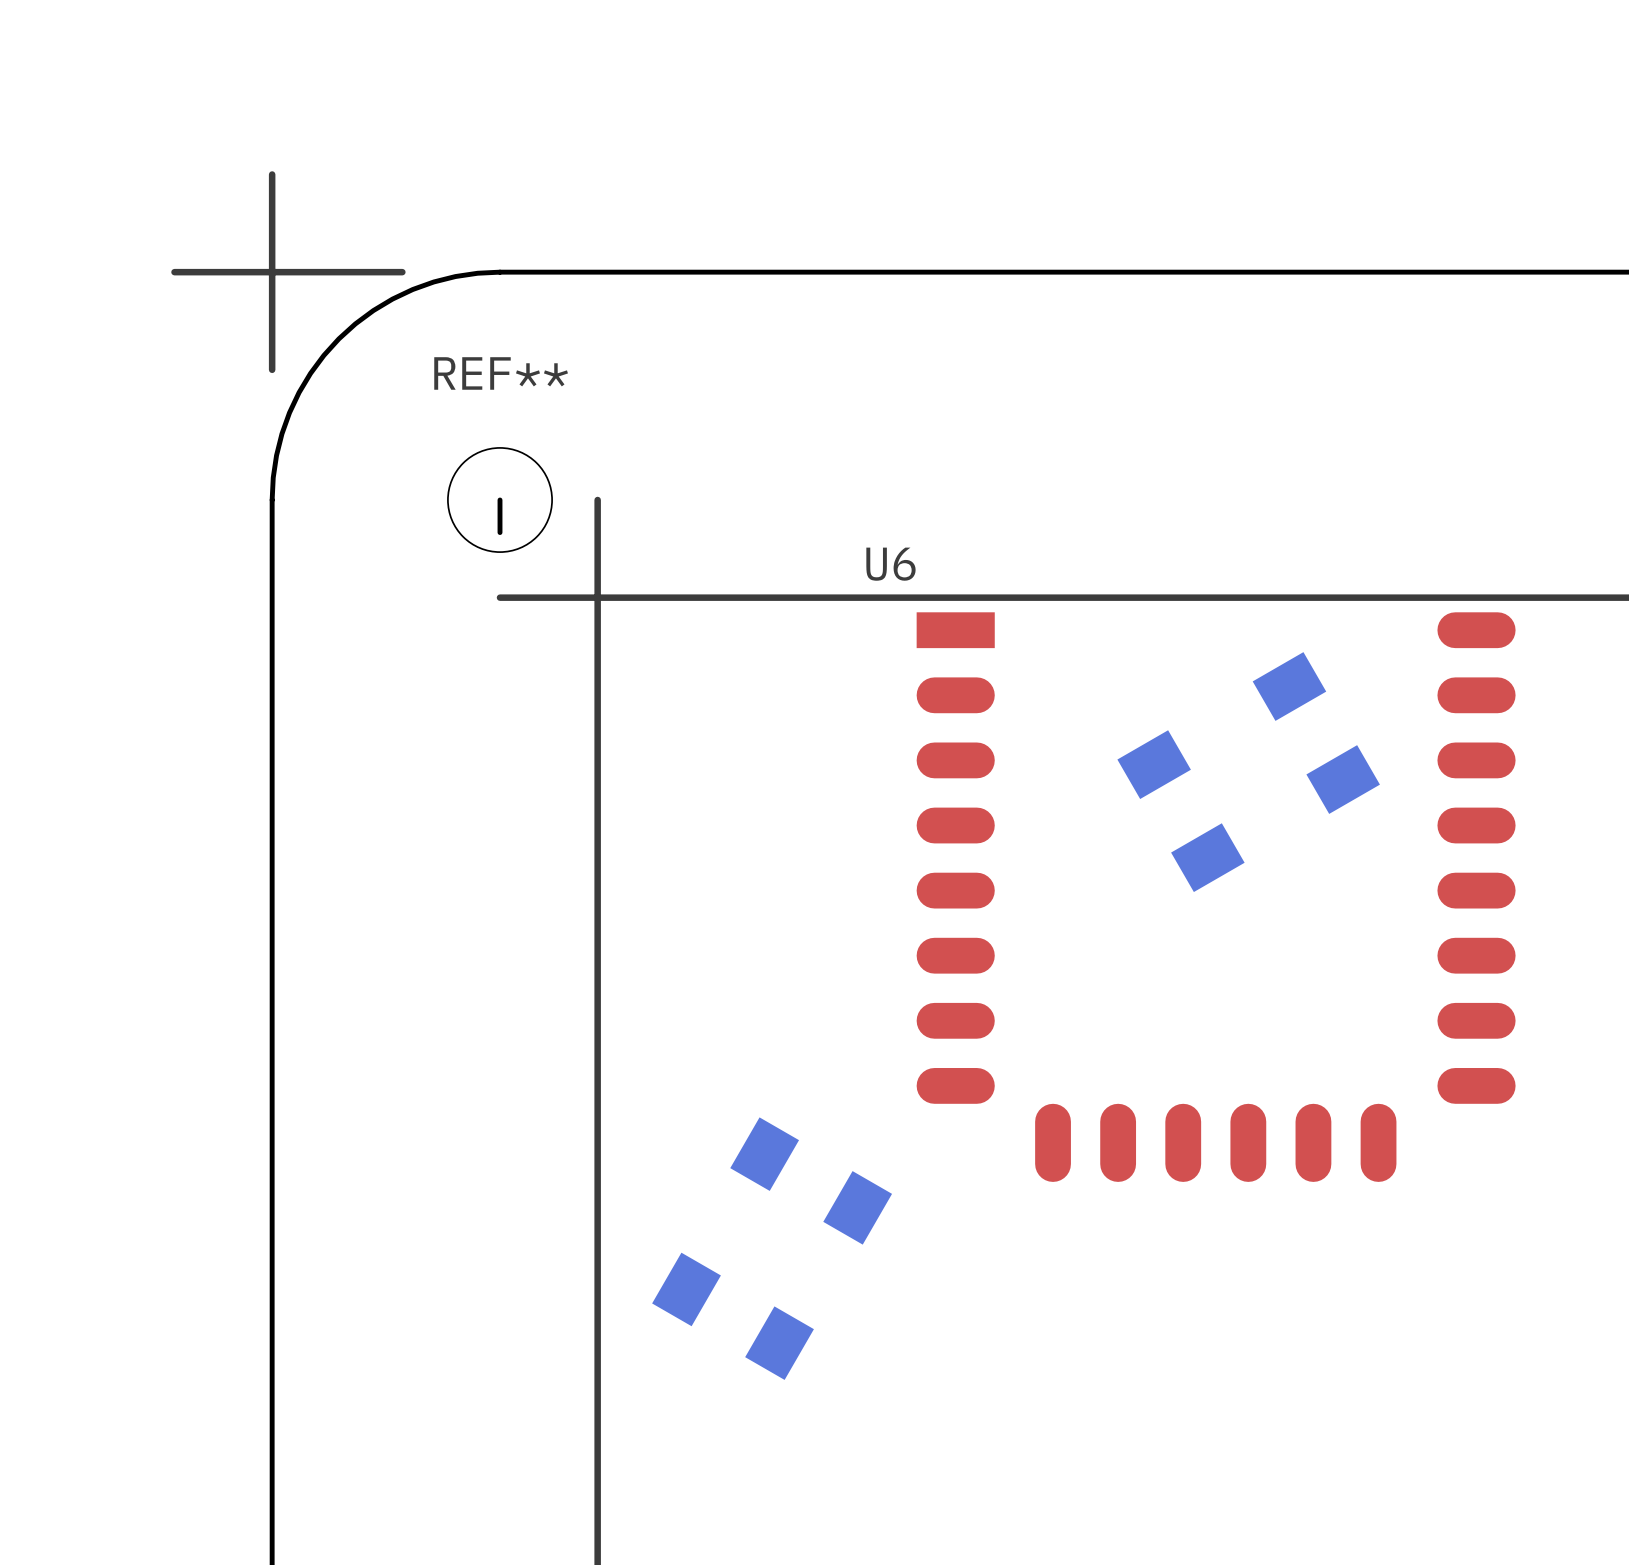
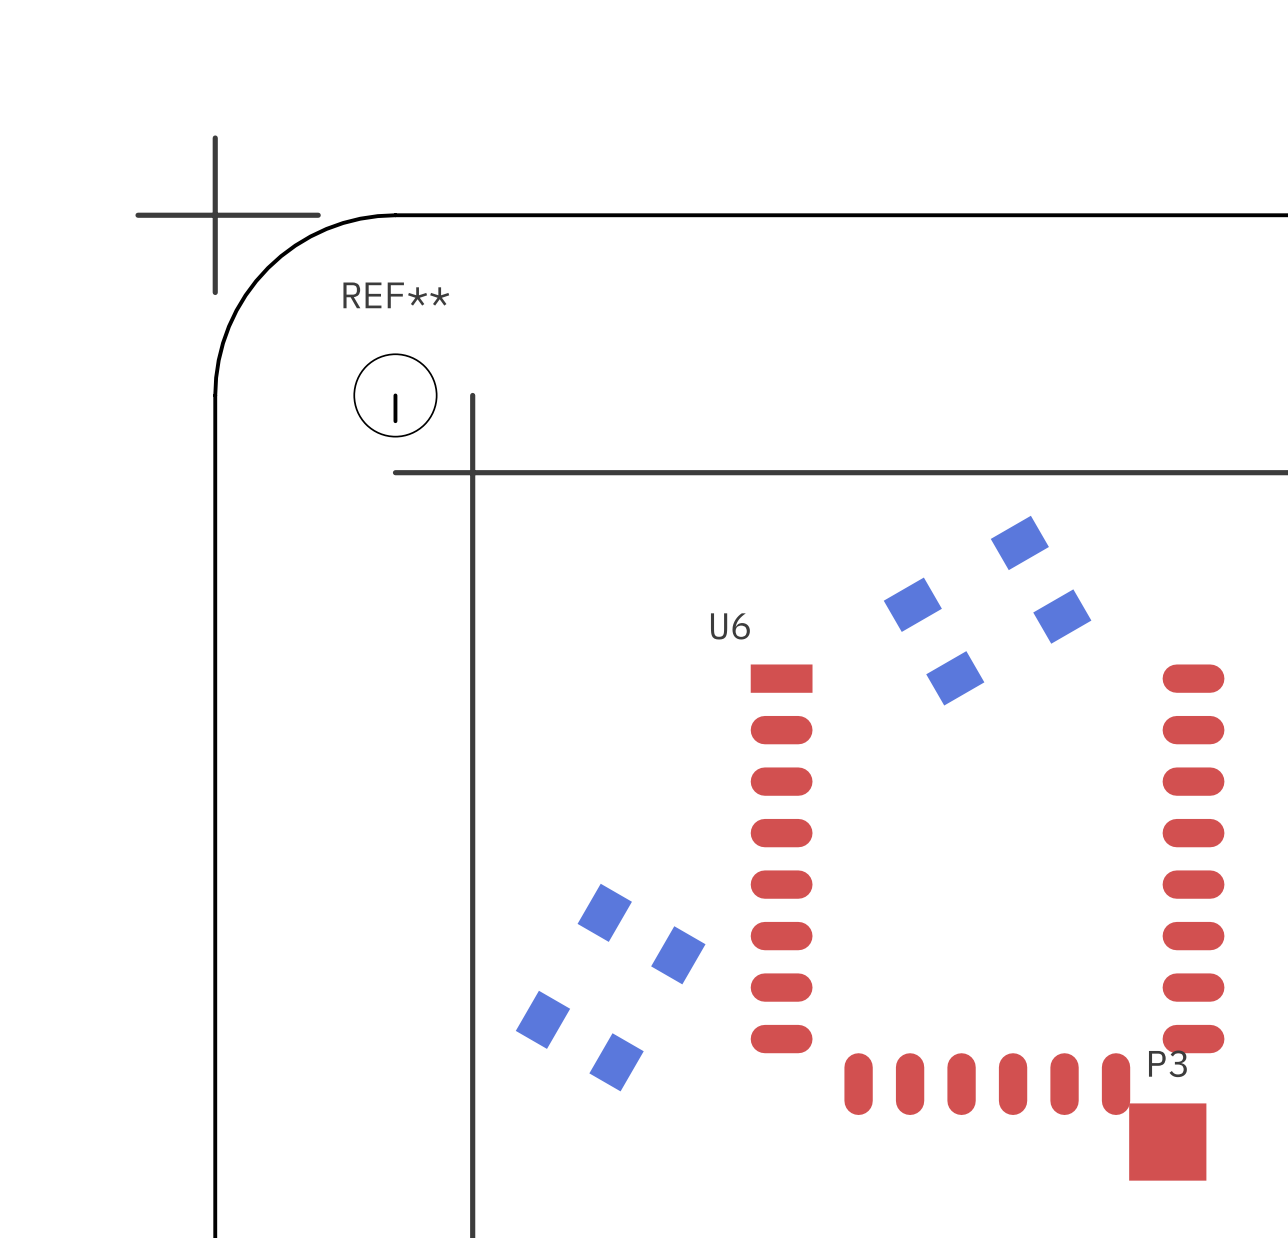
U6 position: (1216, 897) -> (987, 889)
P3: none -> (1167, 1142)

